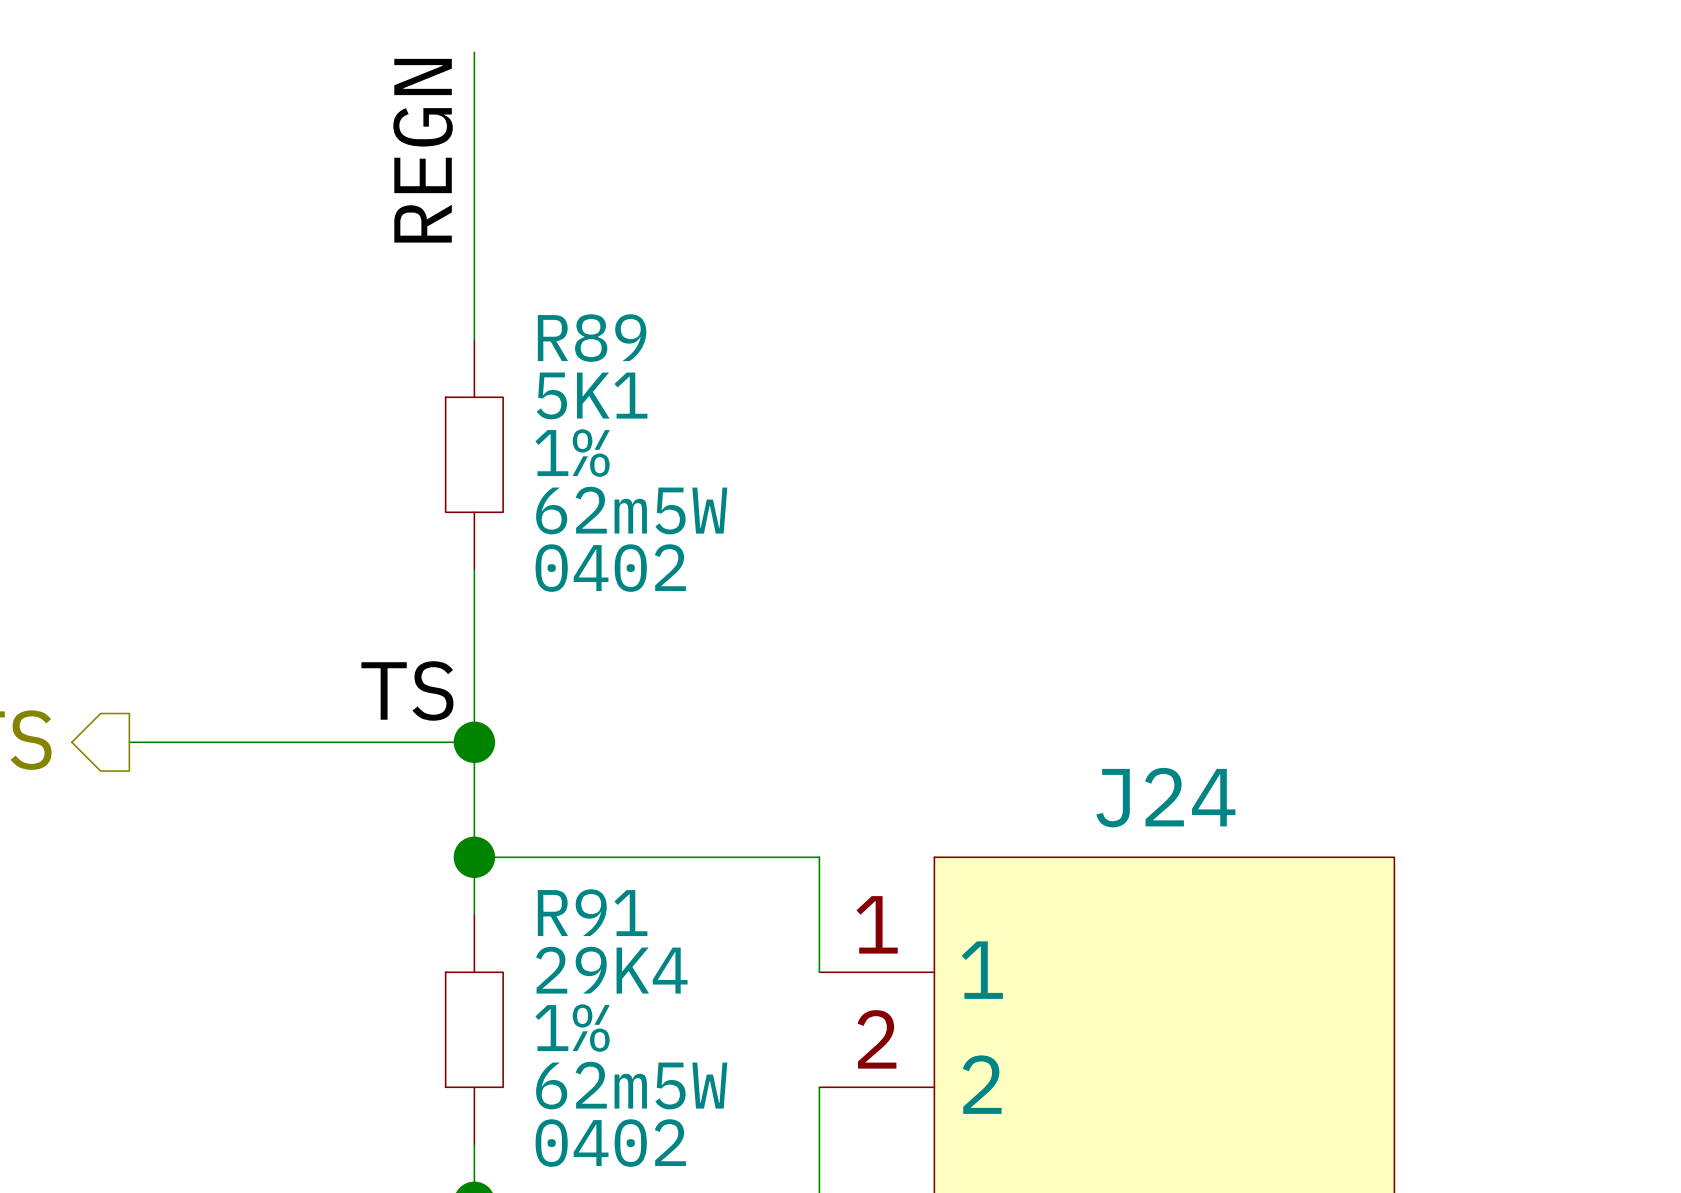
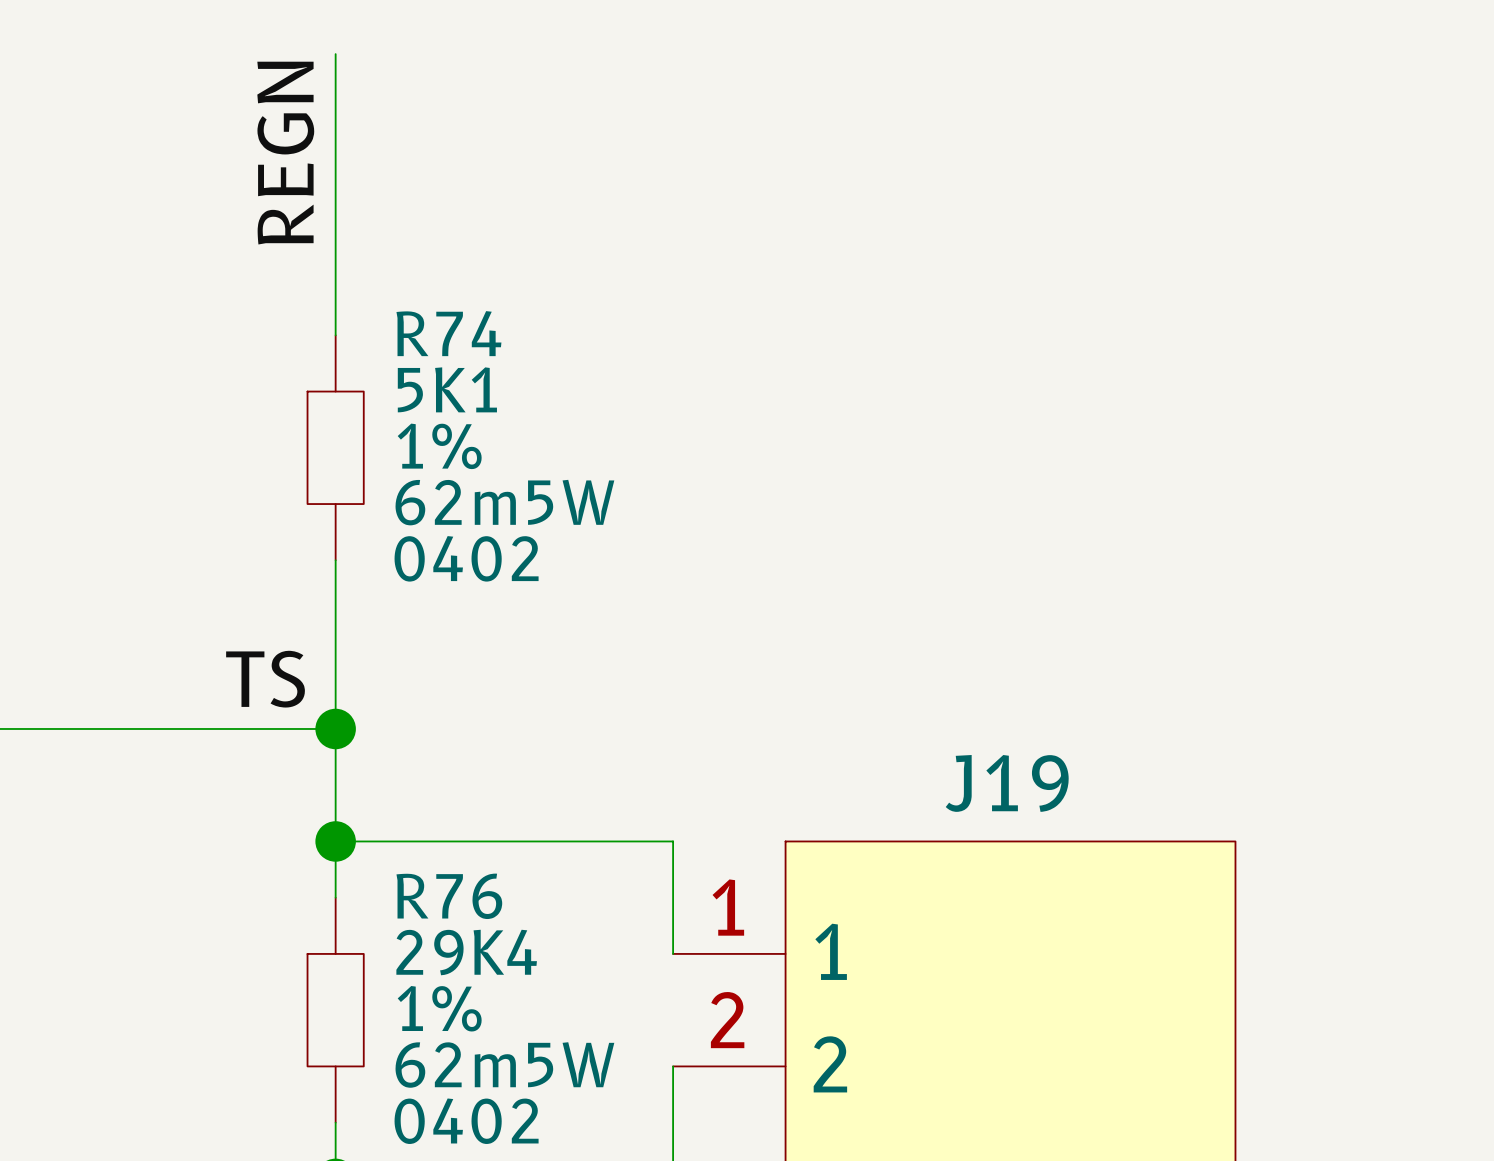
R89 name: R89 (592, 338) -> R74 (448, 333)
J24 name: J24 (1165, 797) -> J19 (1007, 783)
R91 name: R91 (592, 912) -> R76 (449, 896)

